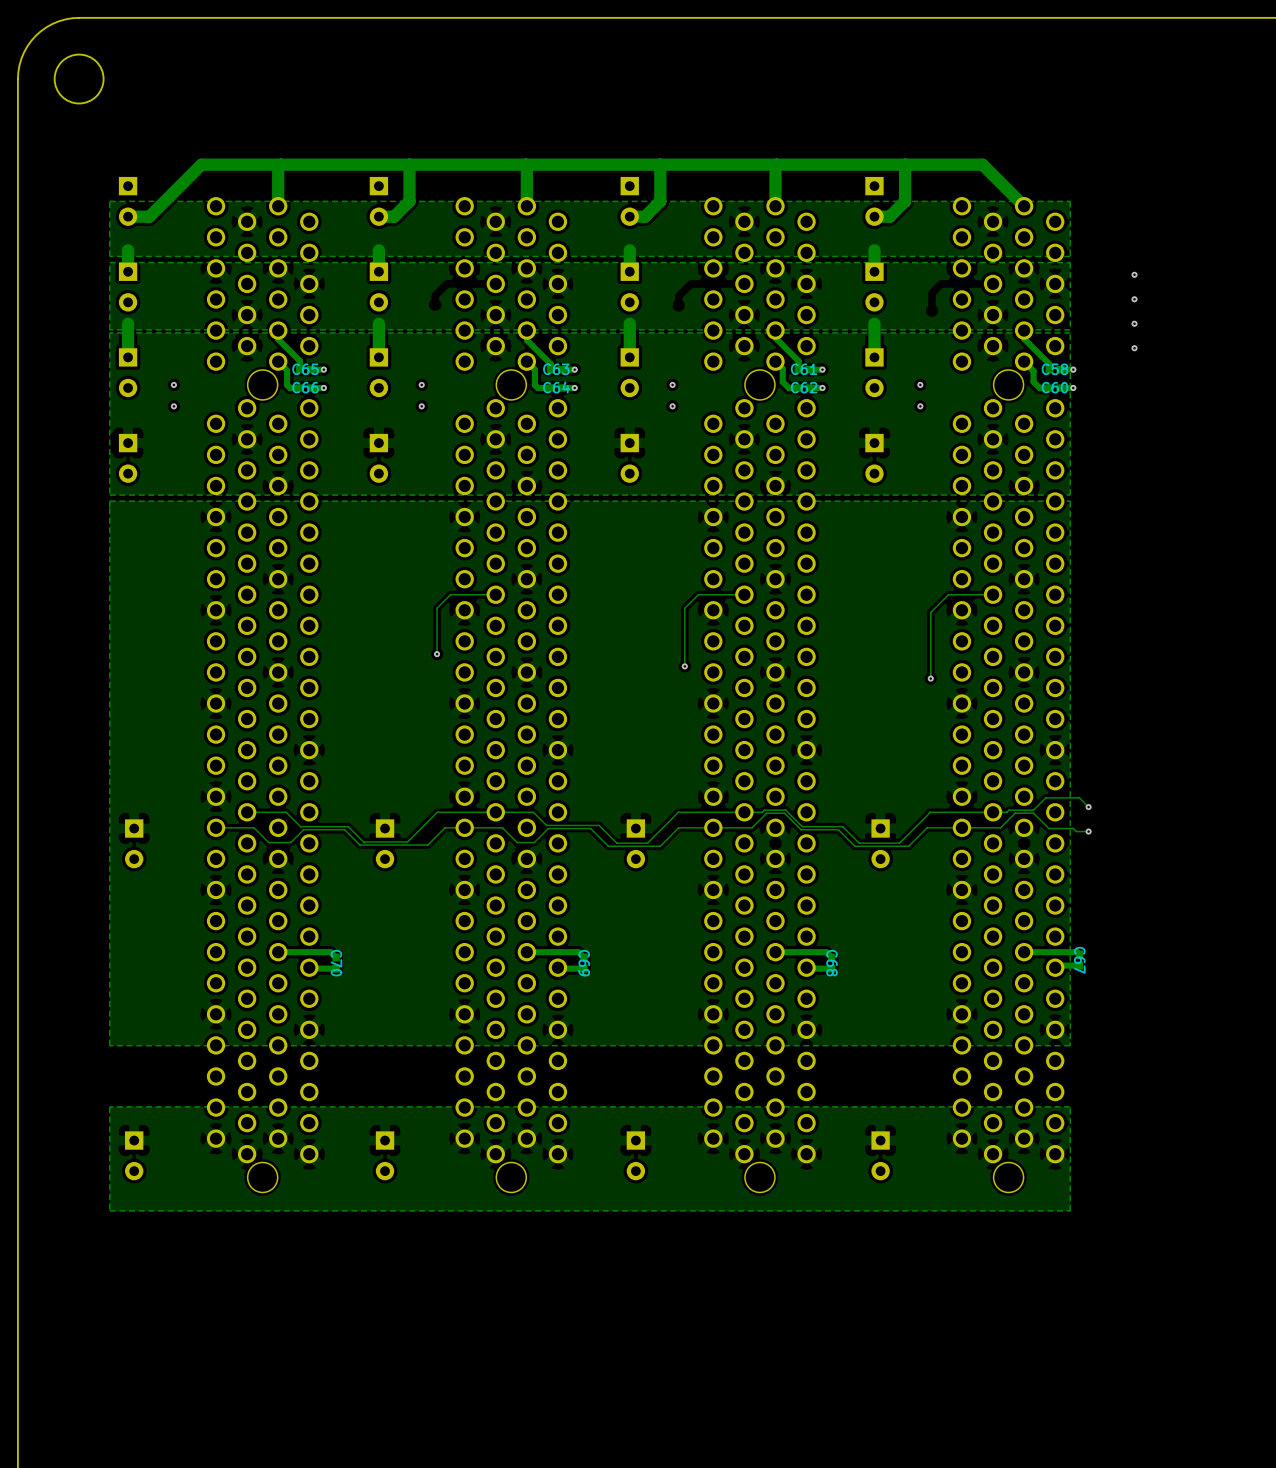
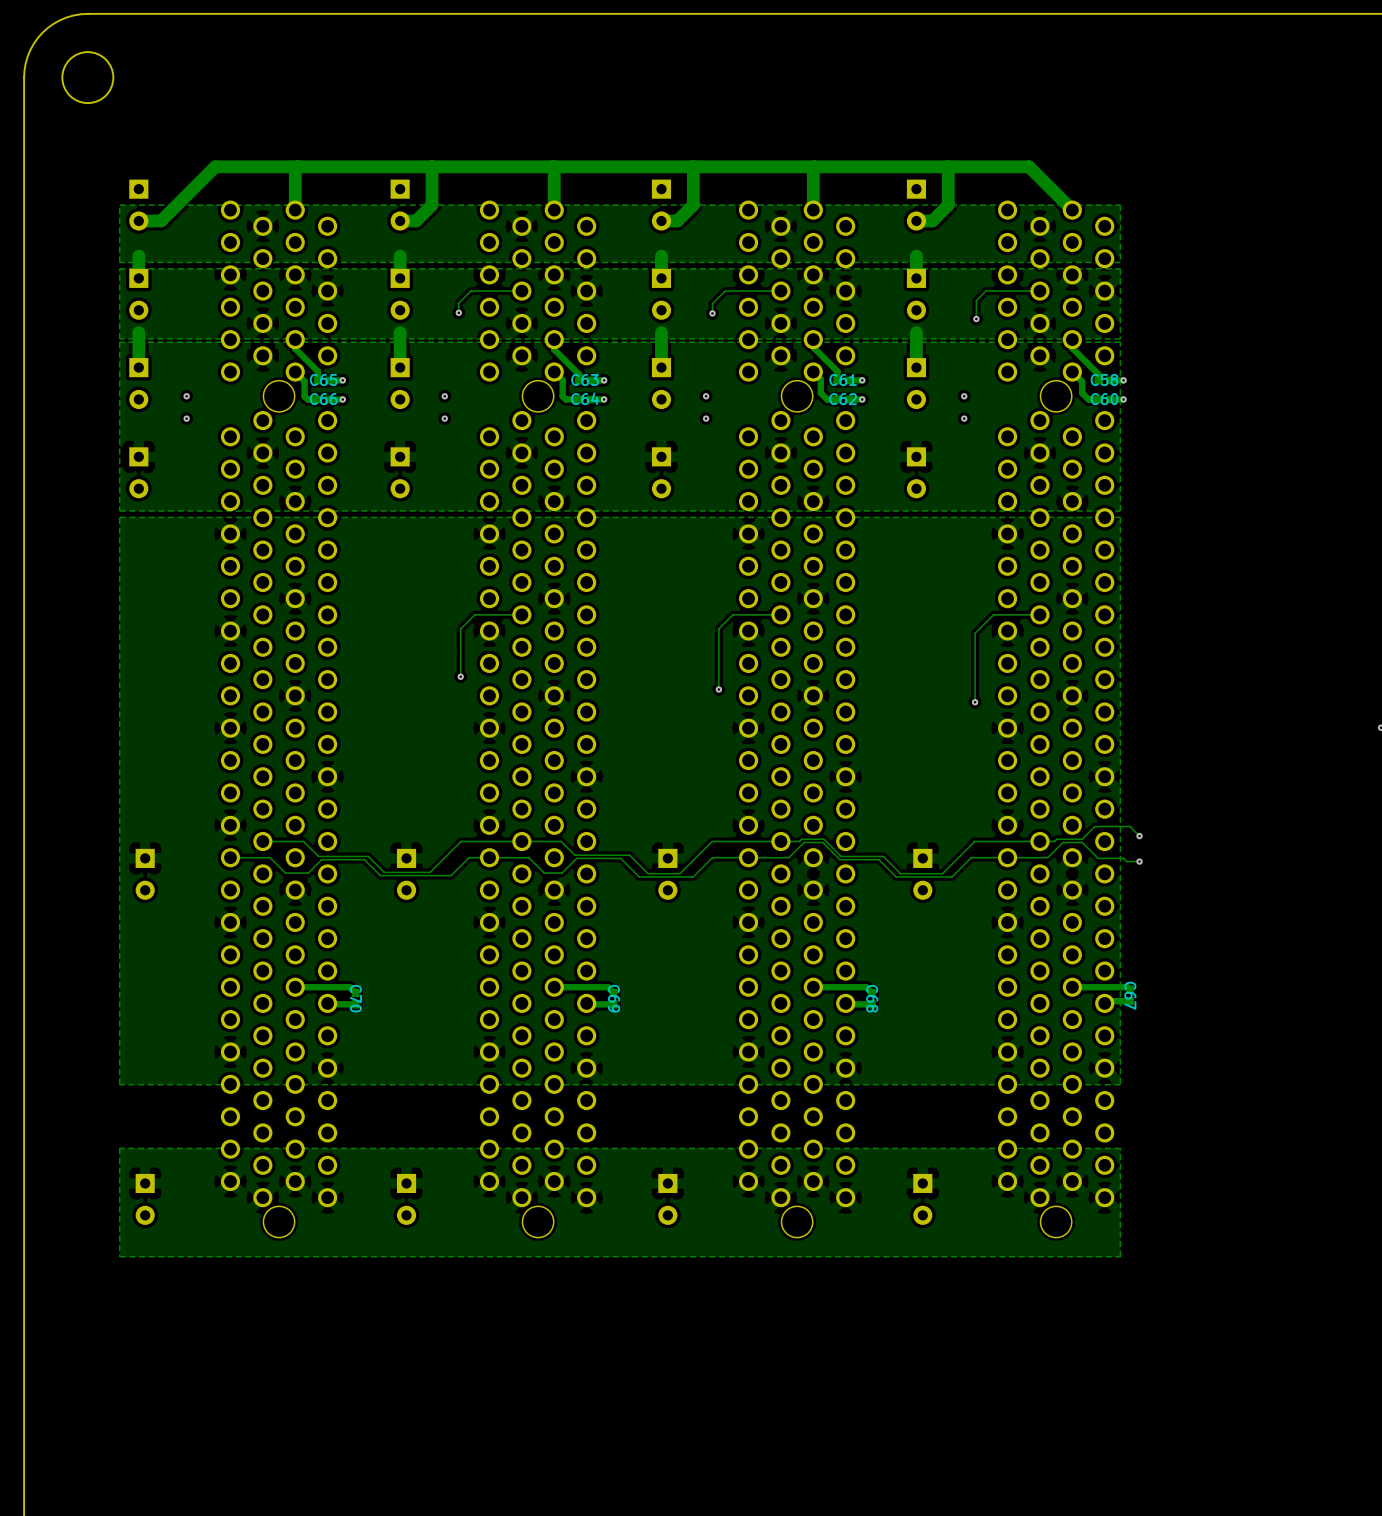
via: (1134, 274) -> none
track: none -> (521, 291) (470, 291) (458, 303) (458, 312)
track: none -> (780, 291) (725, 291) (712, 303) (712, 313)
track: none -> (1039, 291) (985, 291) (976, 300) (976, 319)
via: (1134, 299) -> none
via: none -> (458, 312)
via: none -> (712, 313)
via: none -> (976, 319)
via: (1134, 323) -> none
via: (1134, 348) -> none

